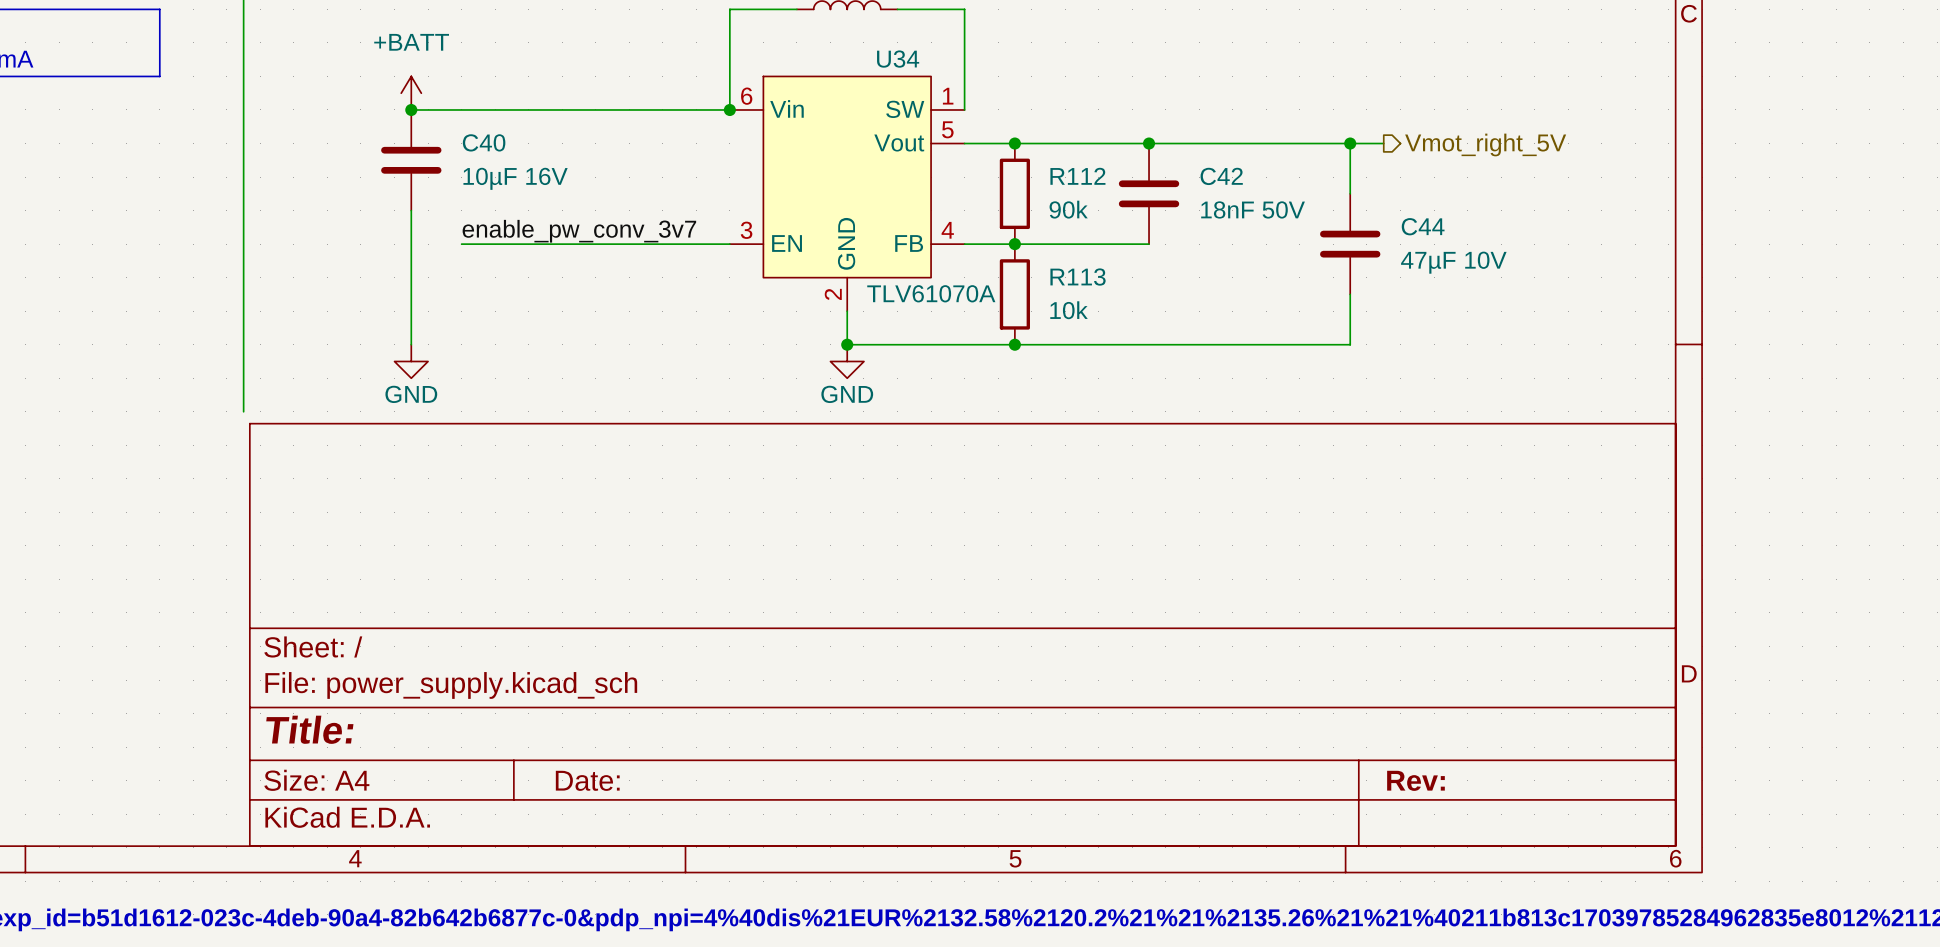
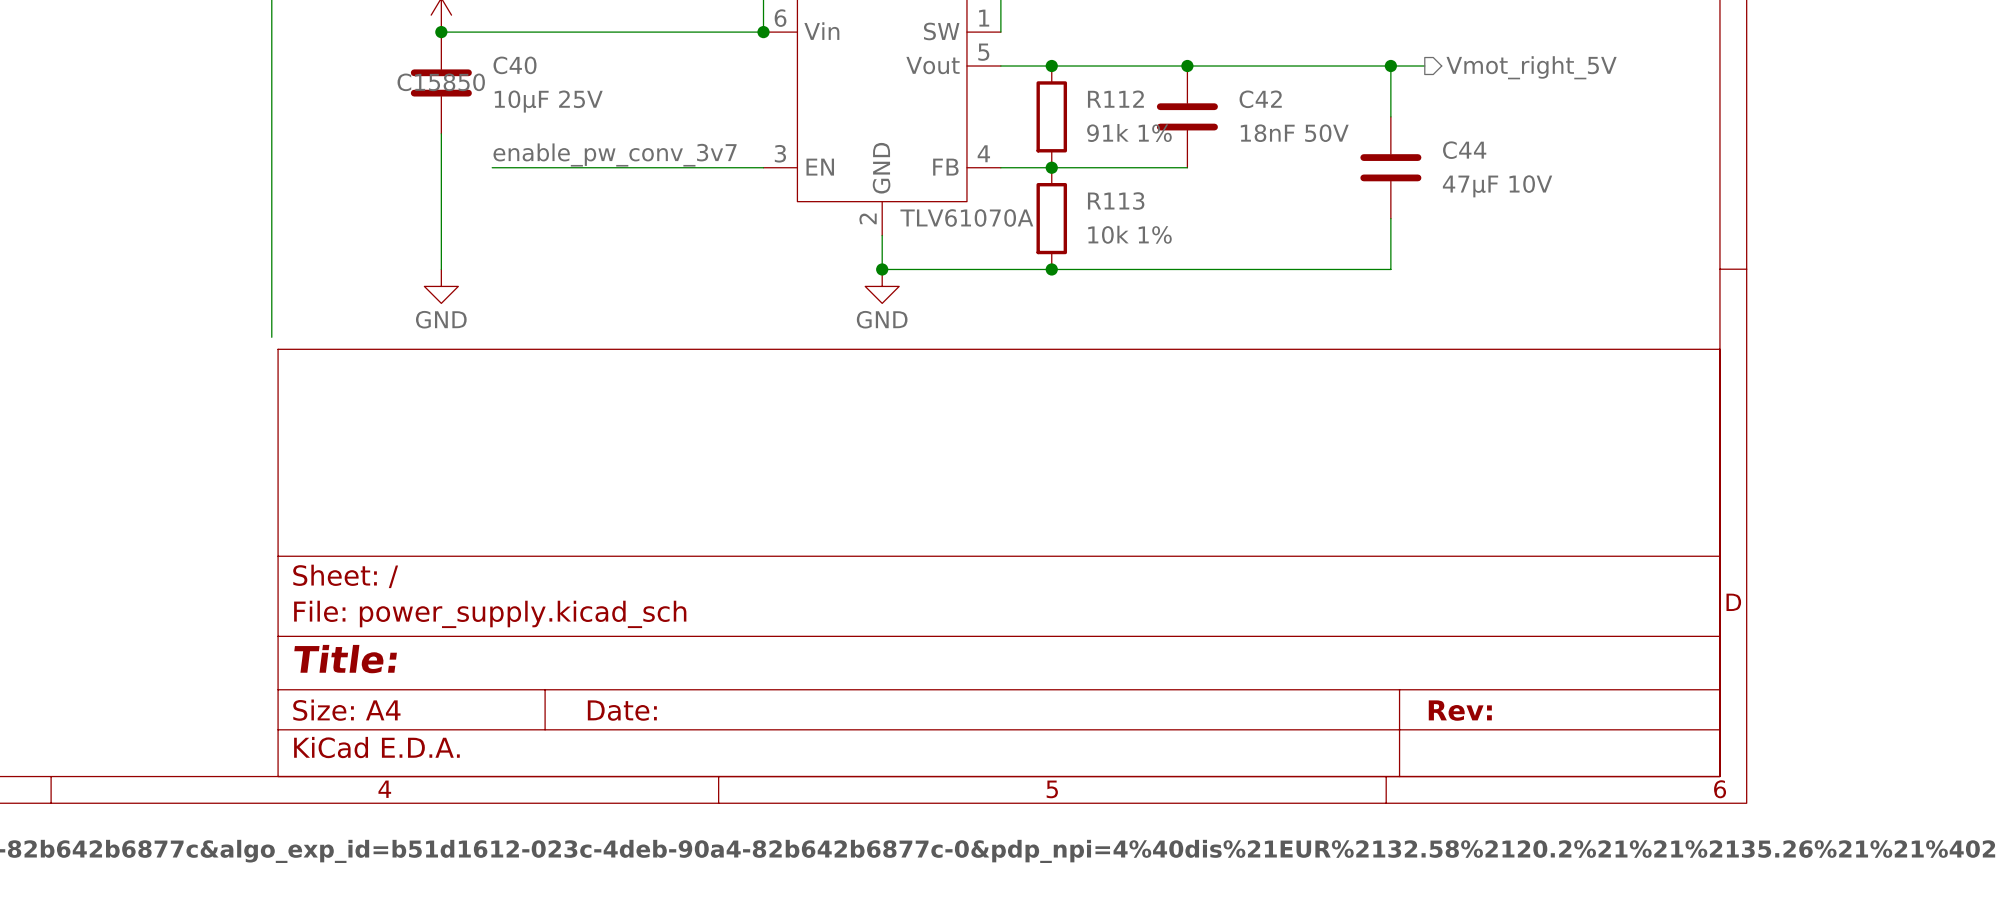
C40 text: none -> C15850 (441, 82)
C40 value: 10µF 16V (515, 178) -> 10µF 25V (548, 101)
R112 value: 90k (1068, 209) -> 91k 1% (1129, 133)
R113 value: 10k (1069, 310) -> 10k 1% (1129, 234)

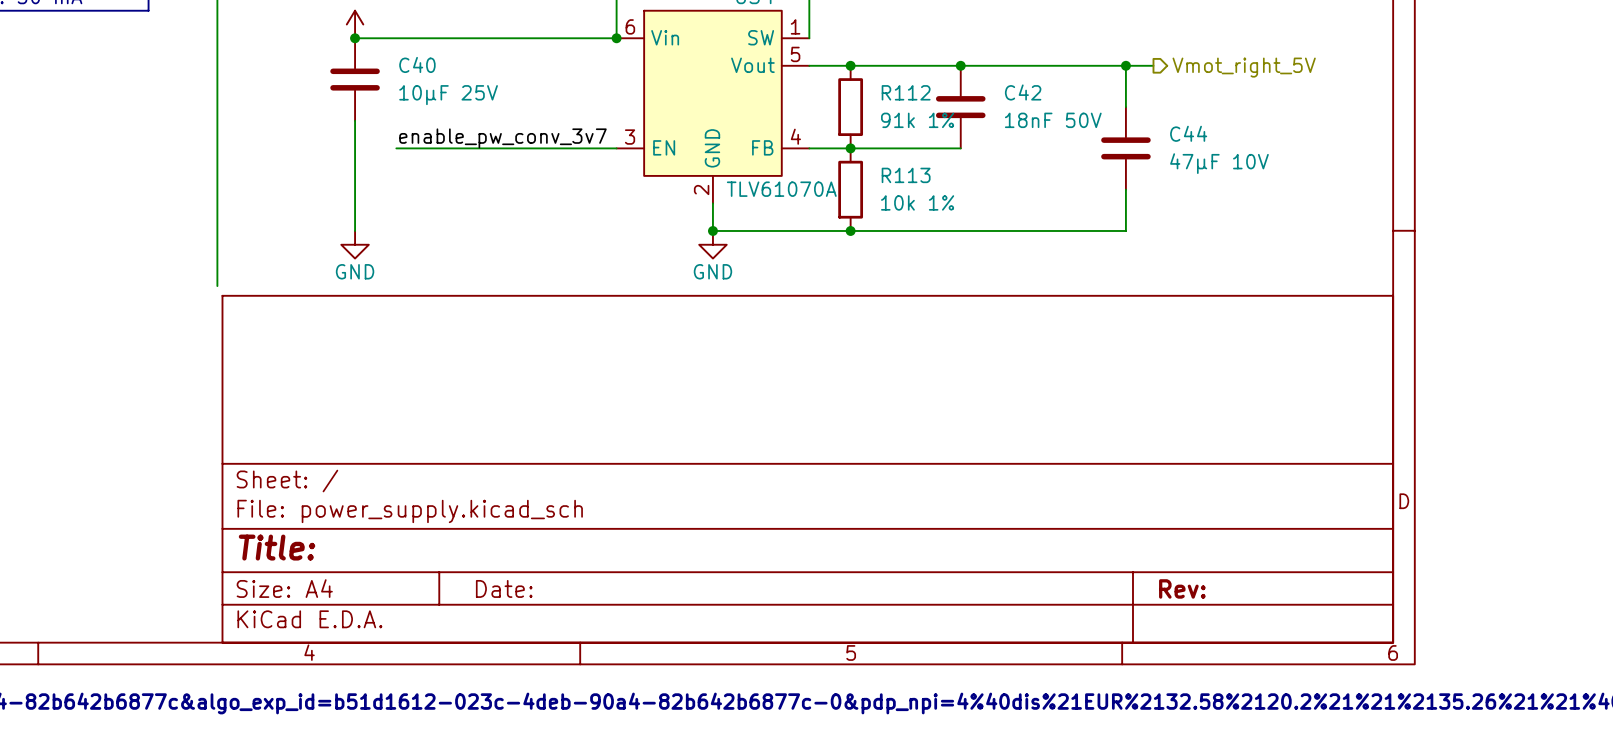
C40 text: C15850 (441, 82) -> none

